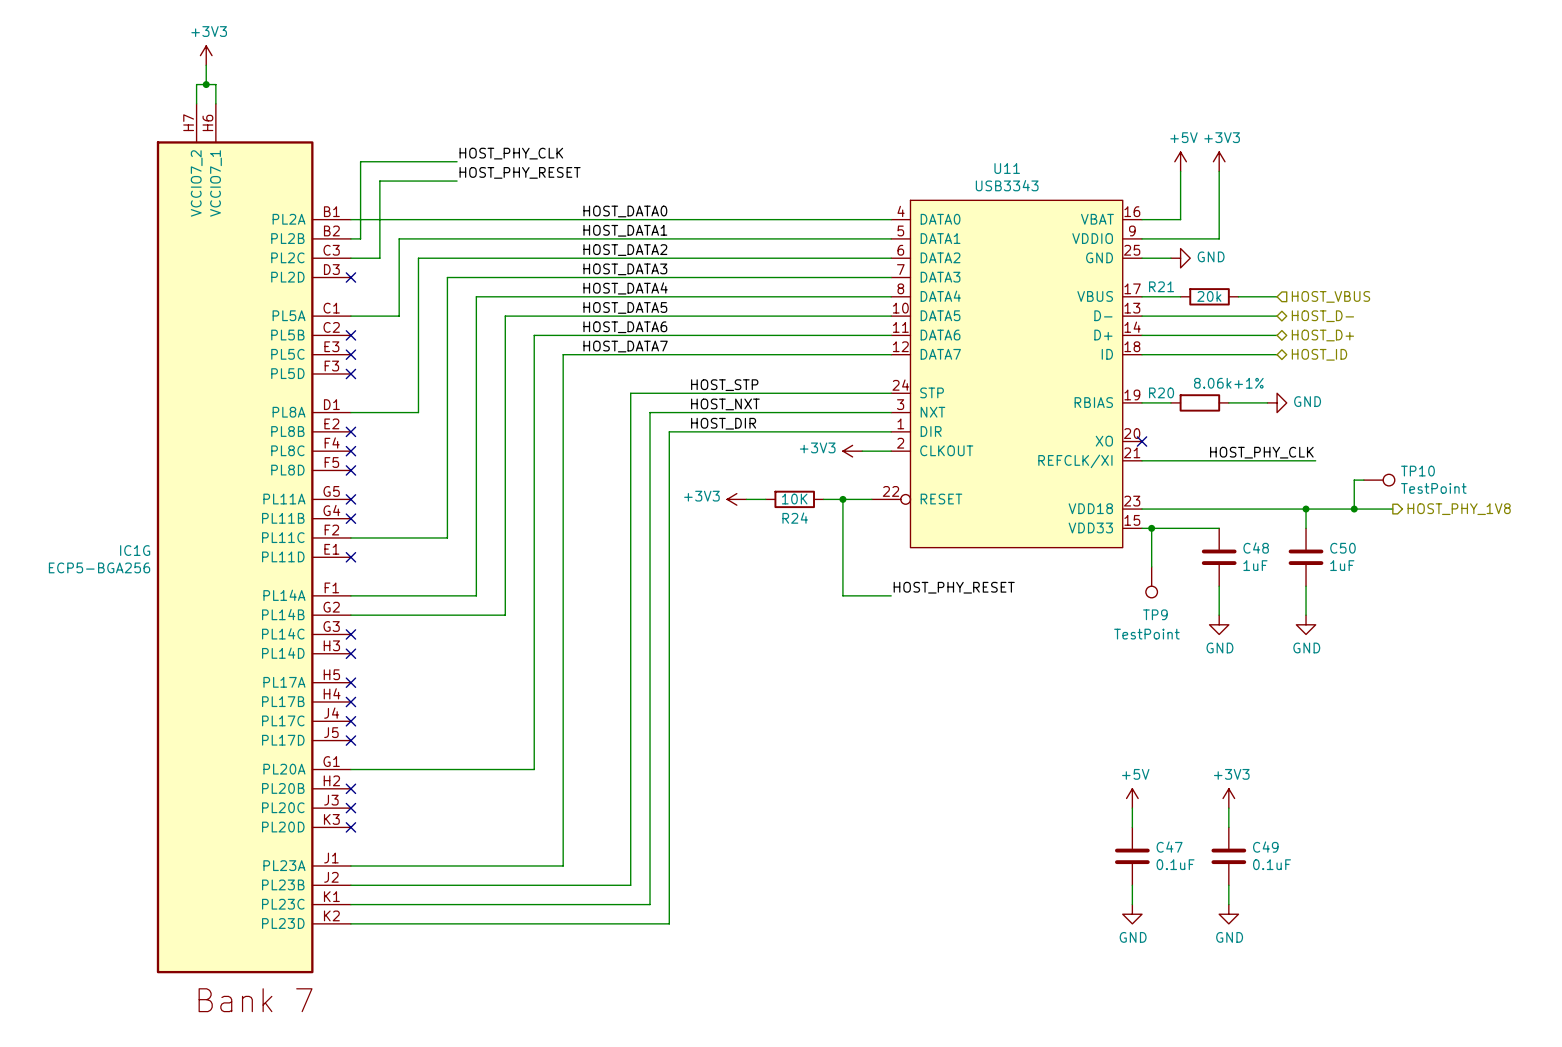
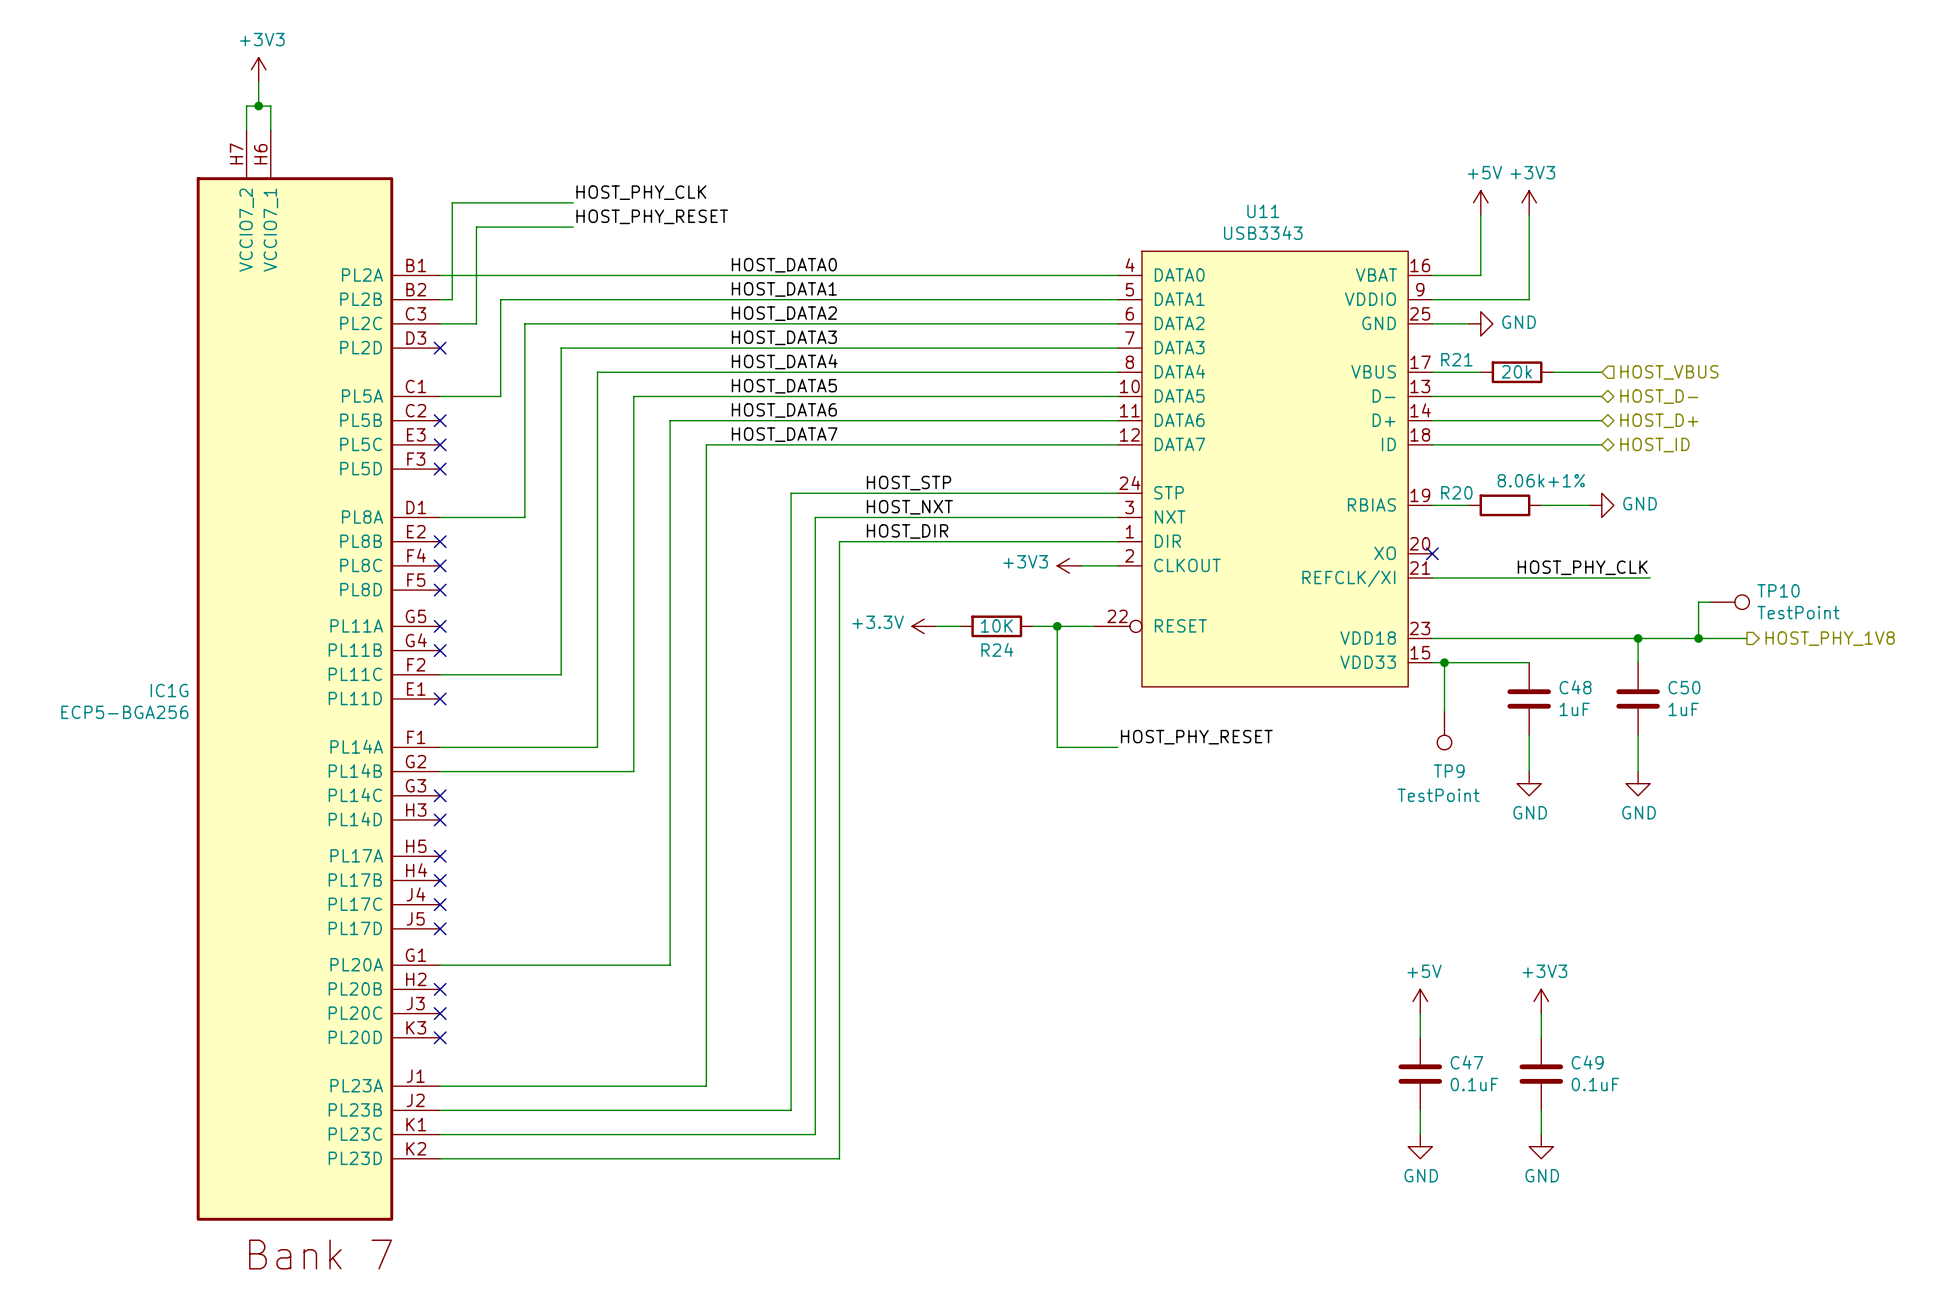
power symbol: +3V3 (736, 499) -> +3.3V (924, 626)

